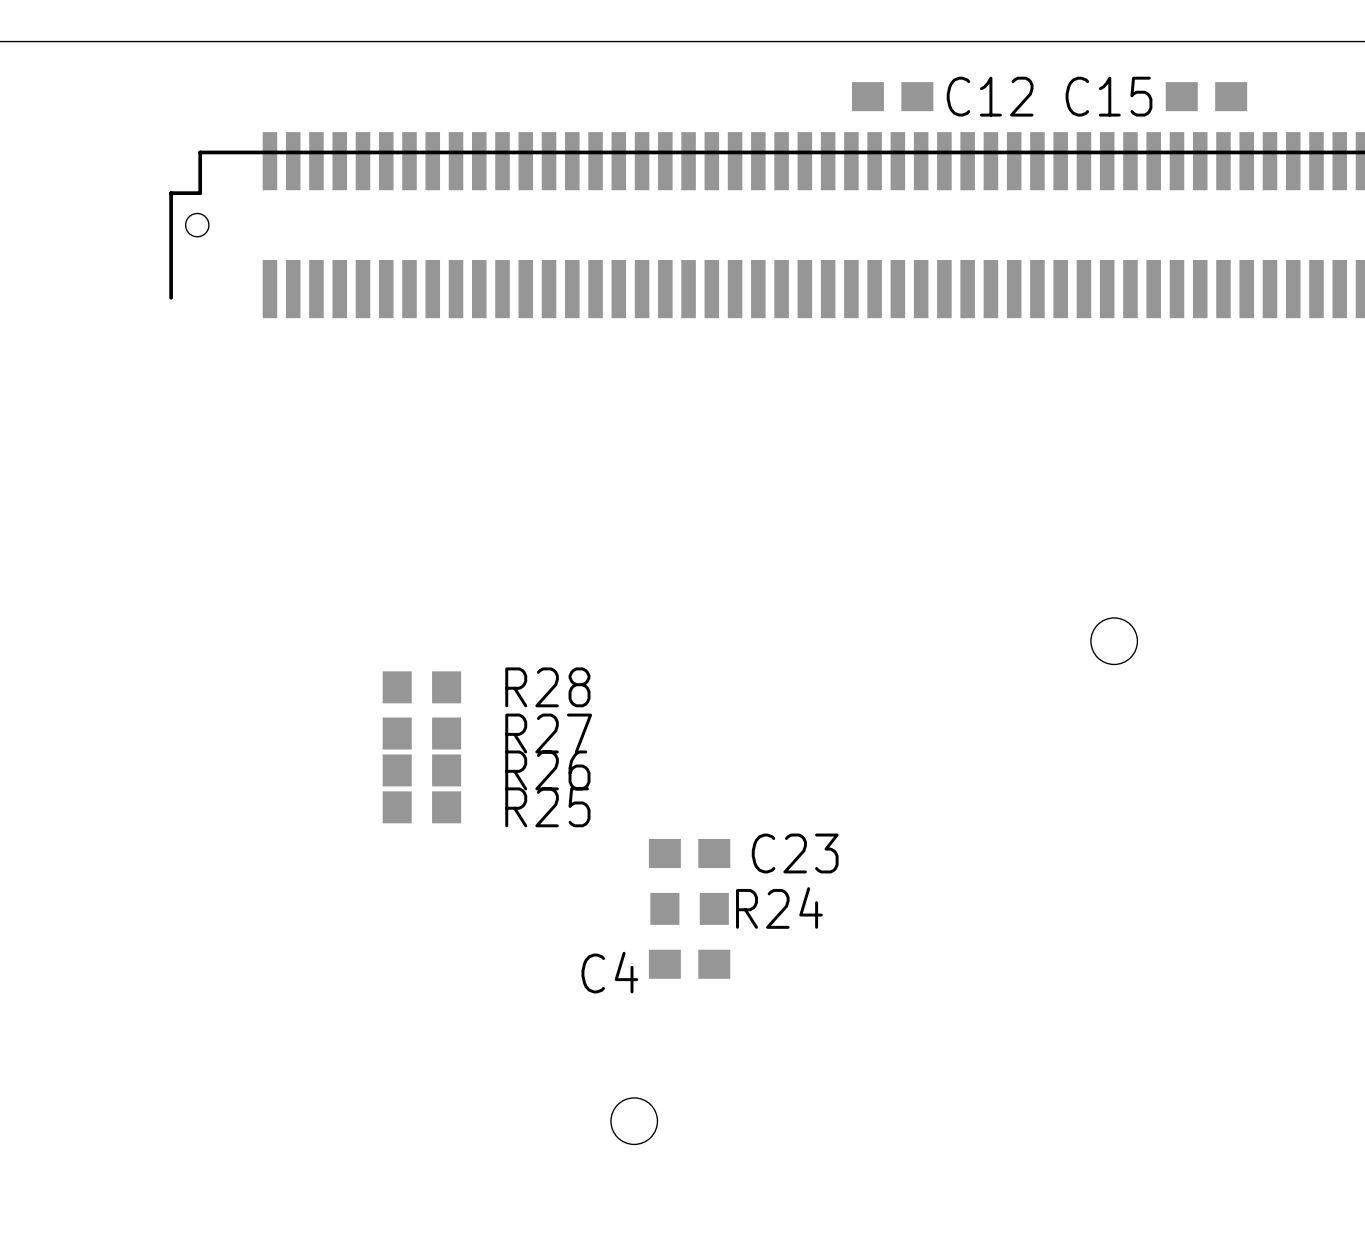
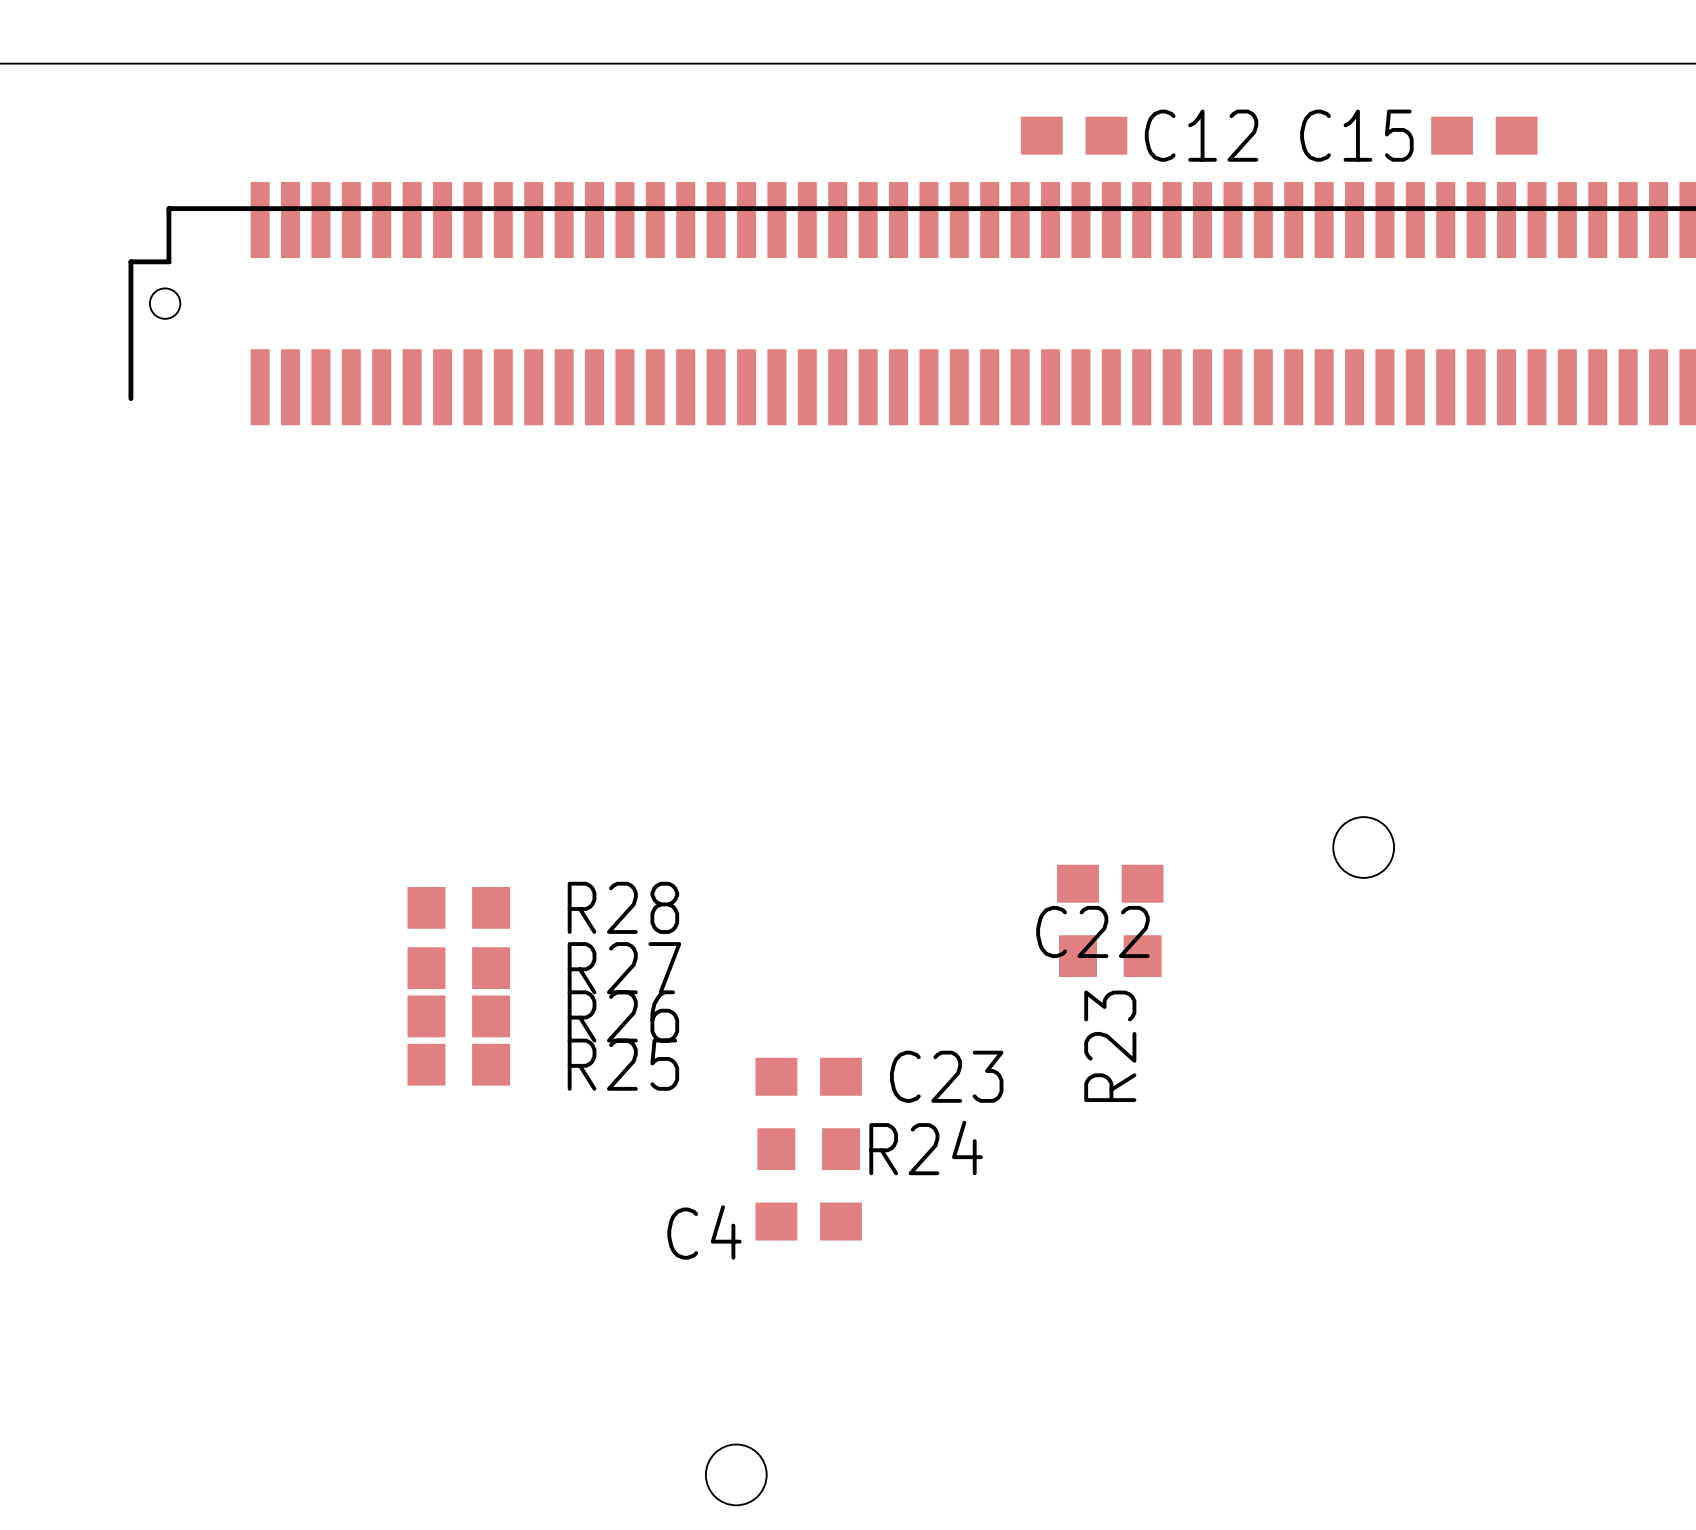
C22: none -> (1110, 883)
R23: none -> (1110, 956)
C23 position: (689, 853) -> (808, 1076)
R24 position: (689, 908) -> (808, 1149)
C4 position: (689, 964) -> (808, 1221)

